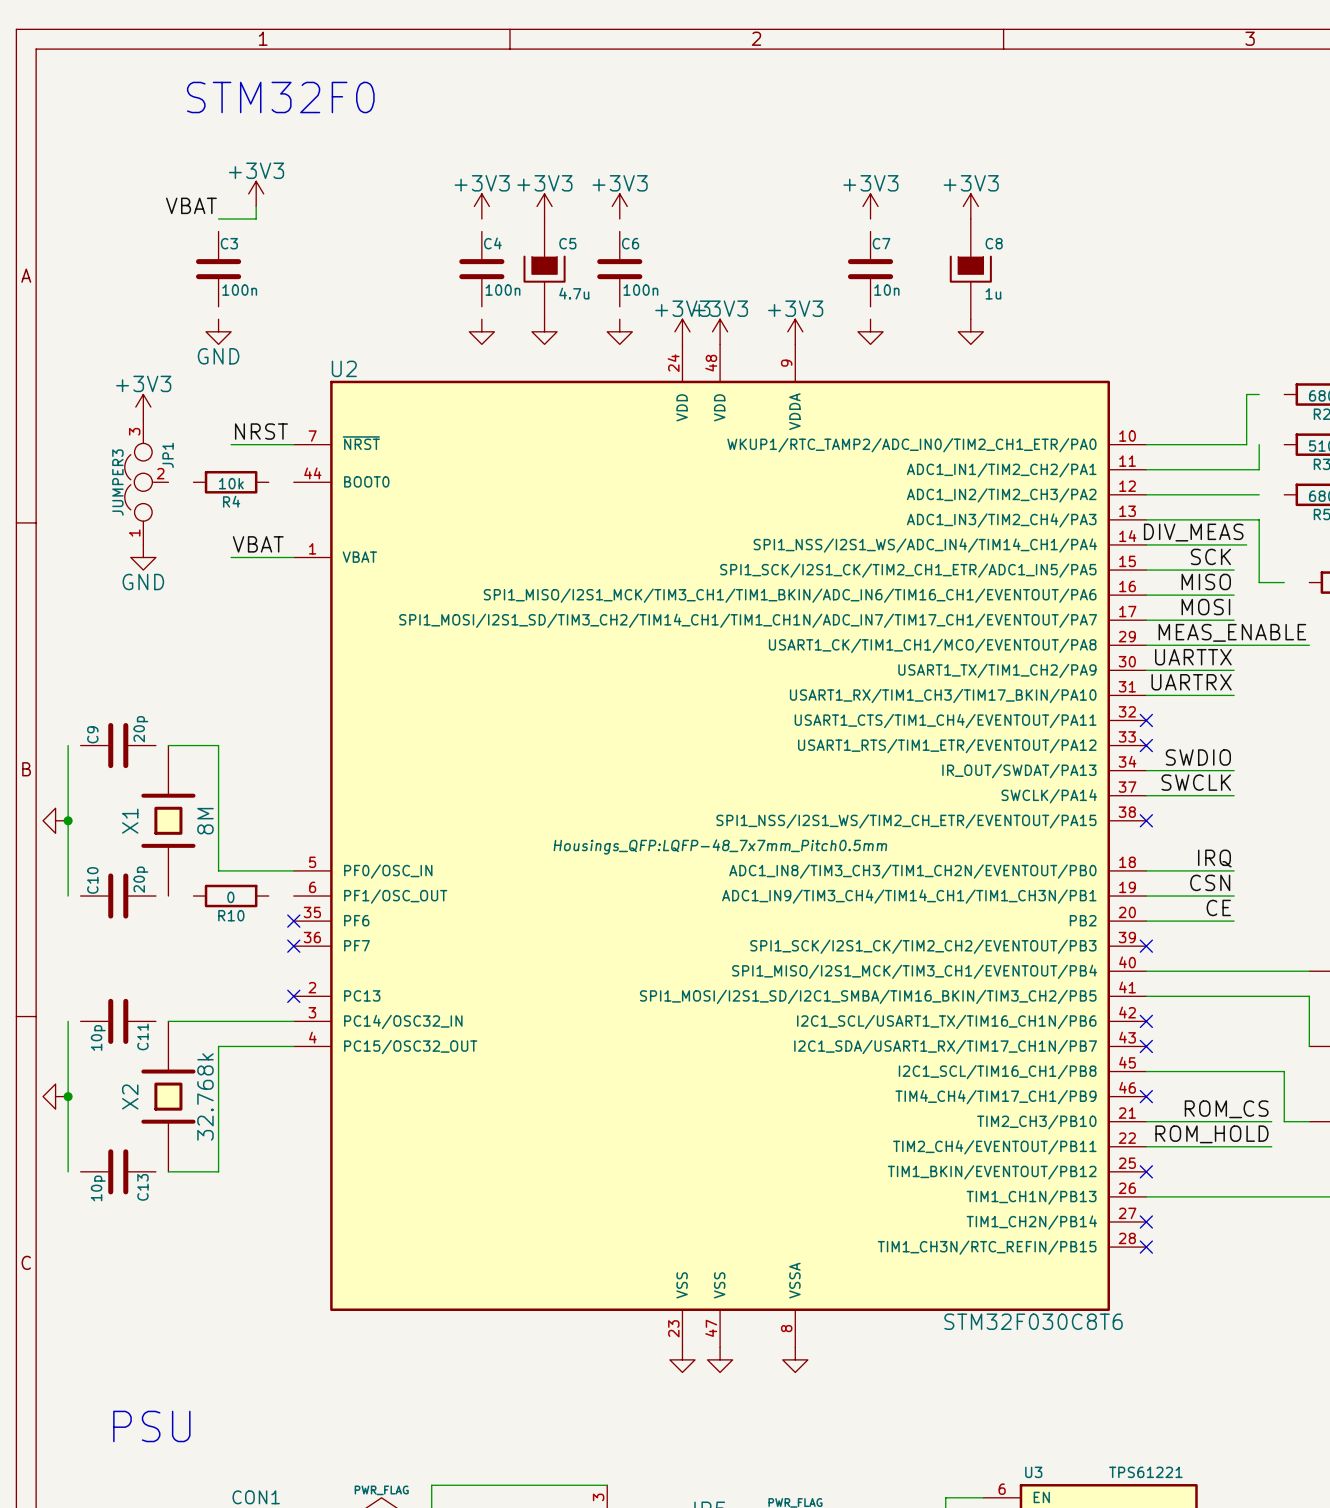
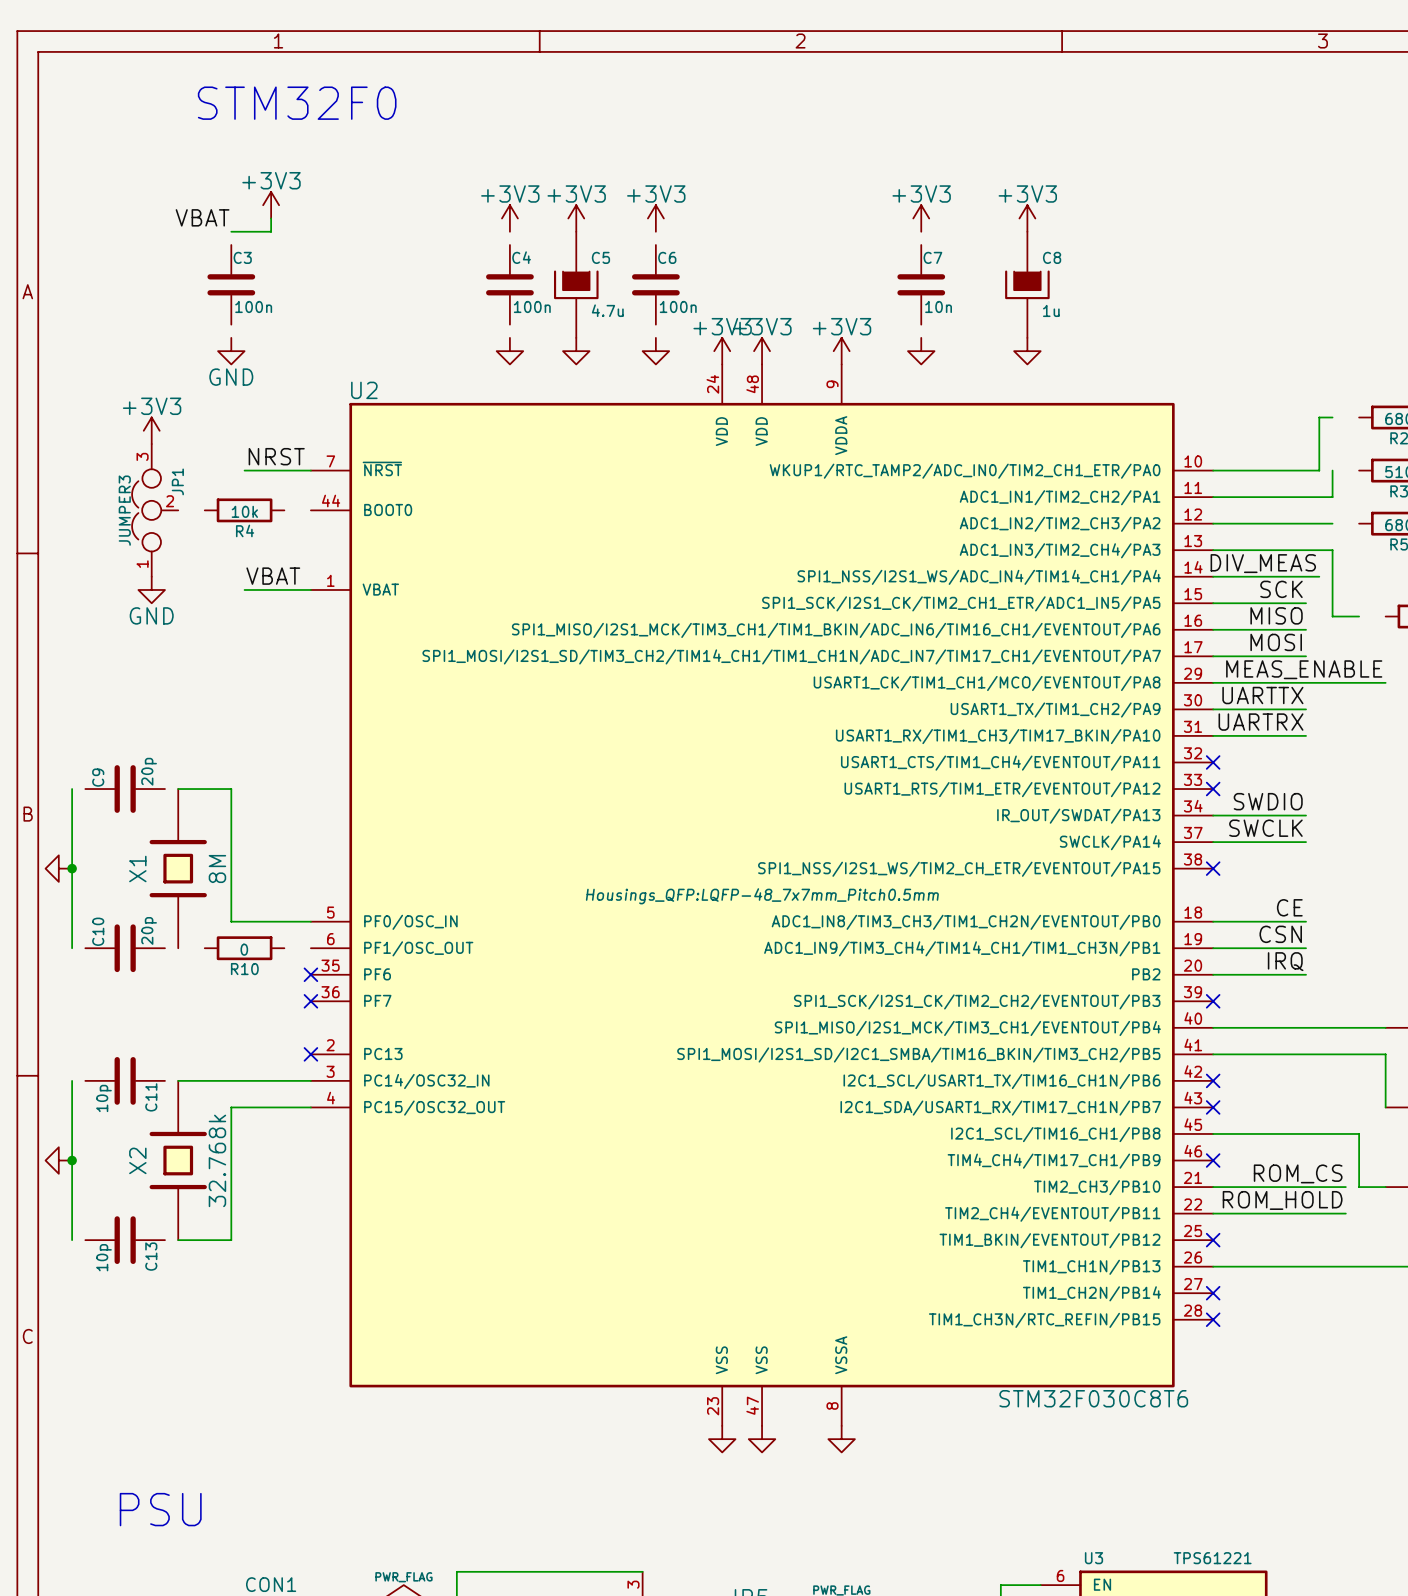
label: IRQ (1214, 858) -> CE (1289, 907)
label: CE (1218, 907) -> IRQ (1285, 961)

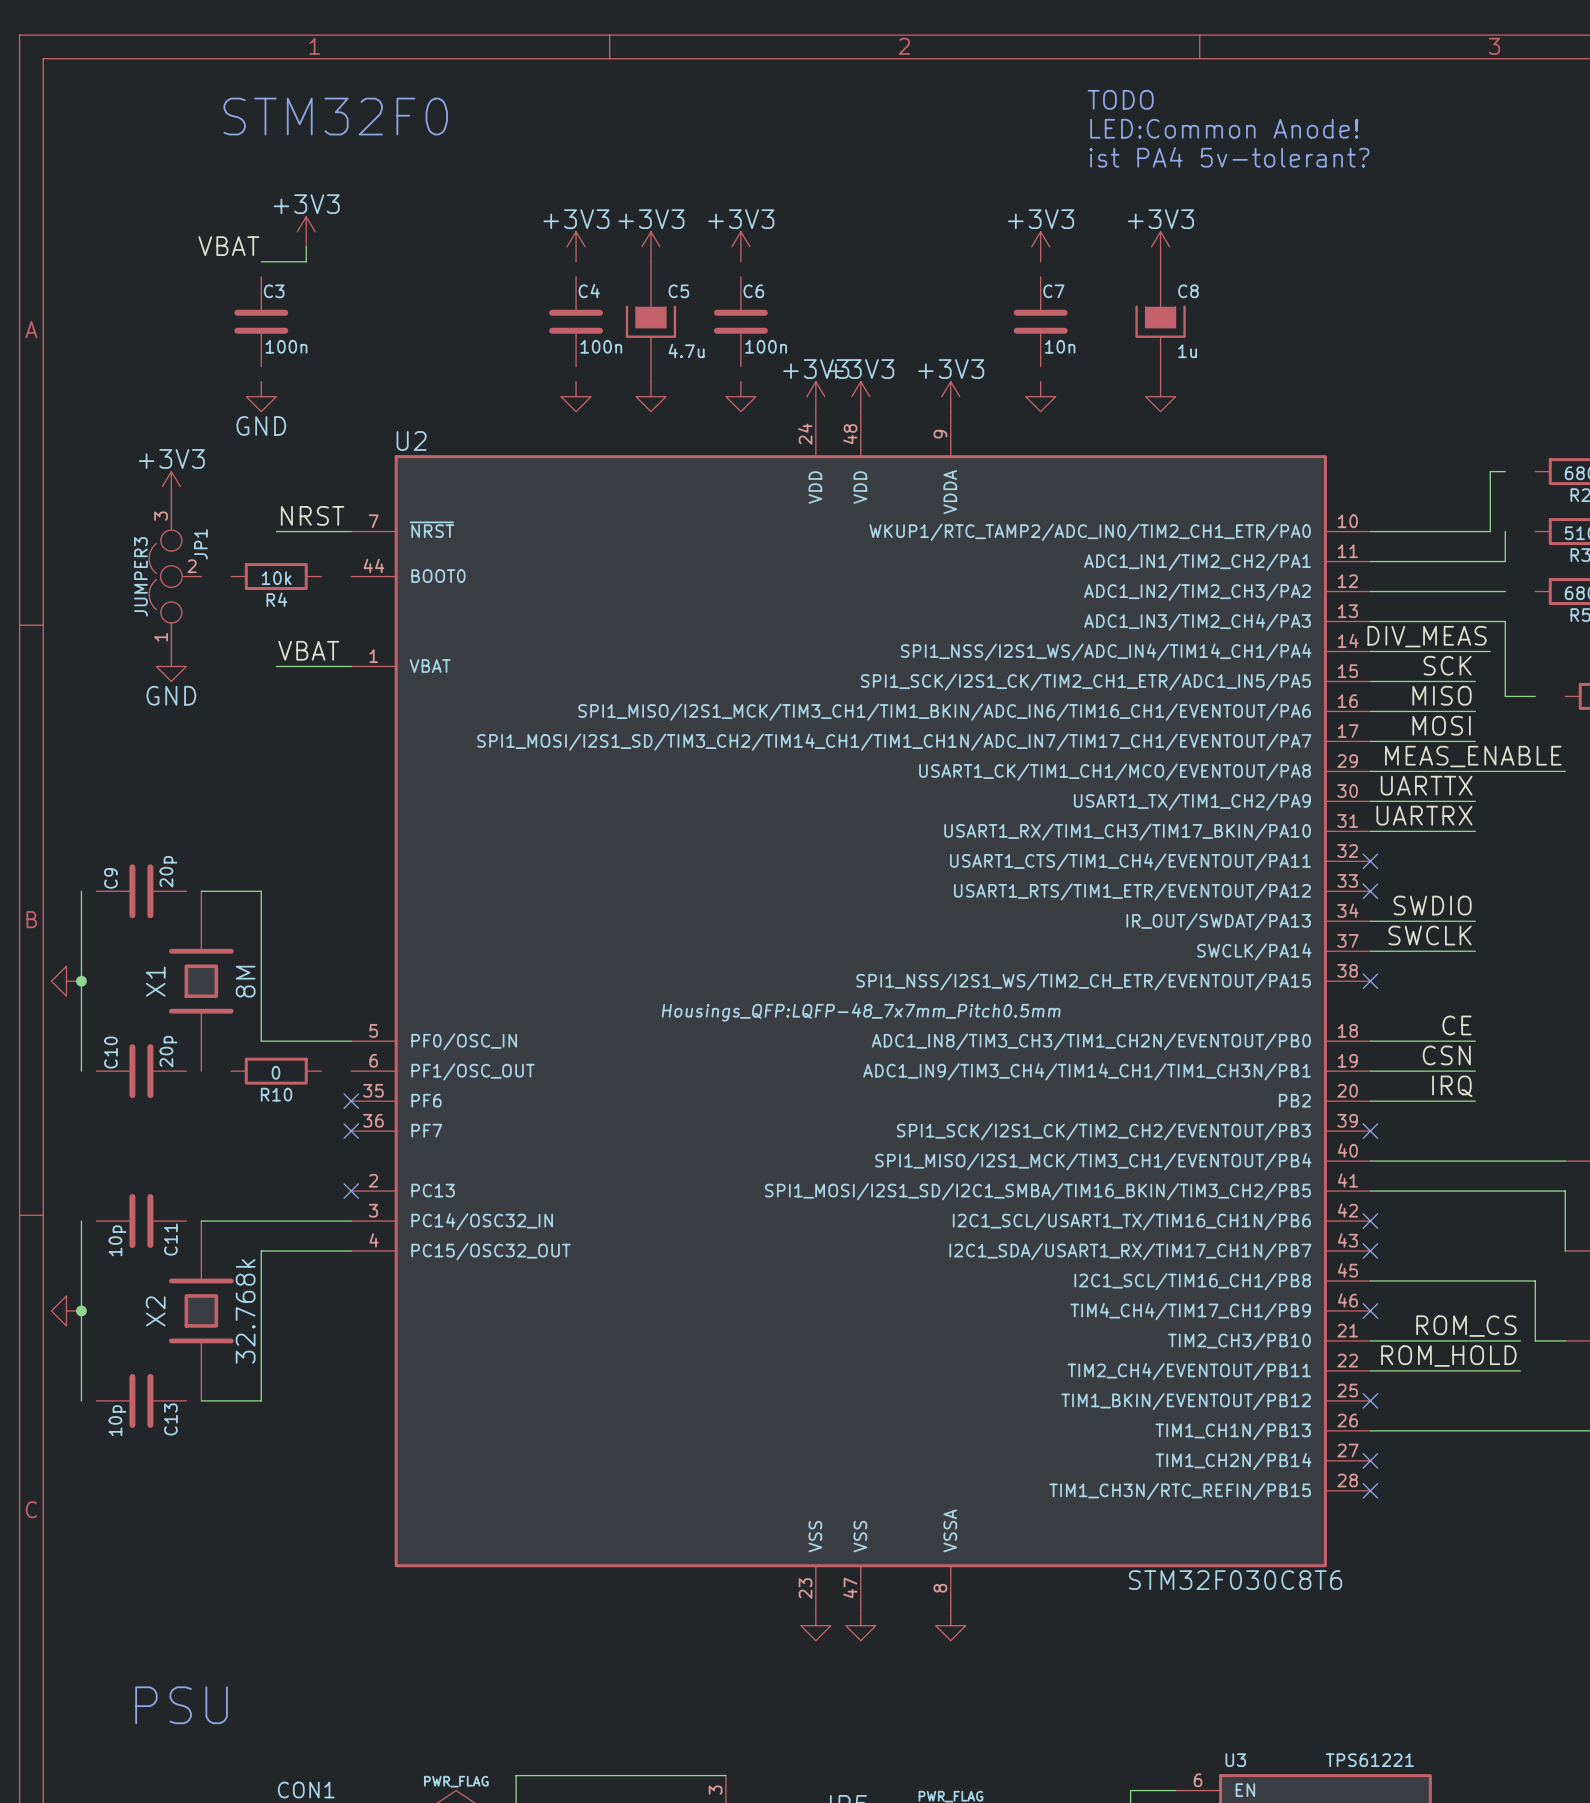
text: none -> TODO (1120, 99)
text: none -> LED:Common Anode! (1224, 128)
text: none -> ist PA4 5v-tolerant? (1229, 157)

